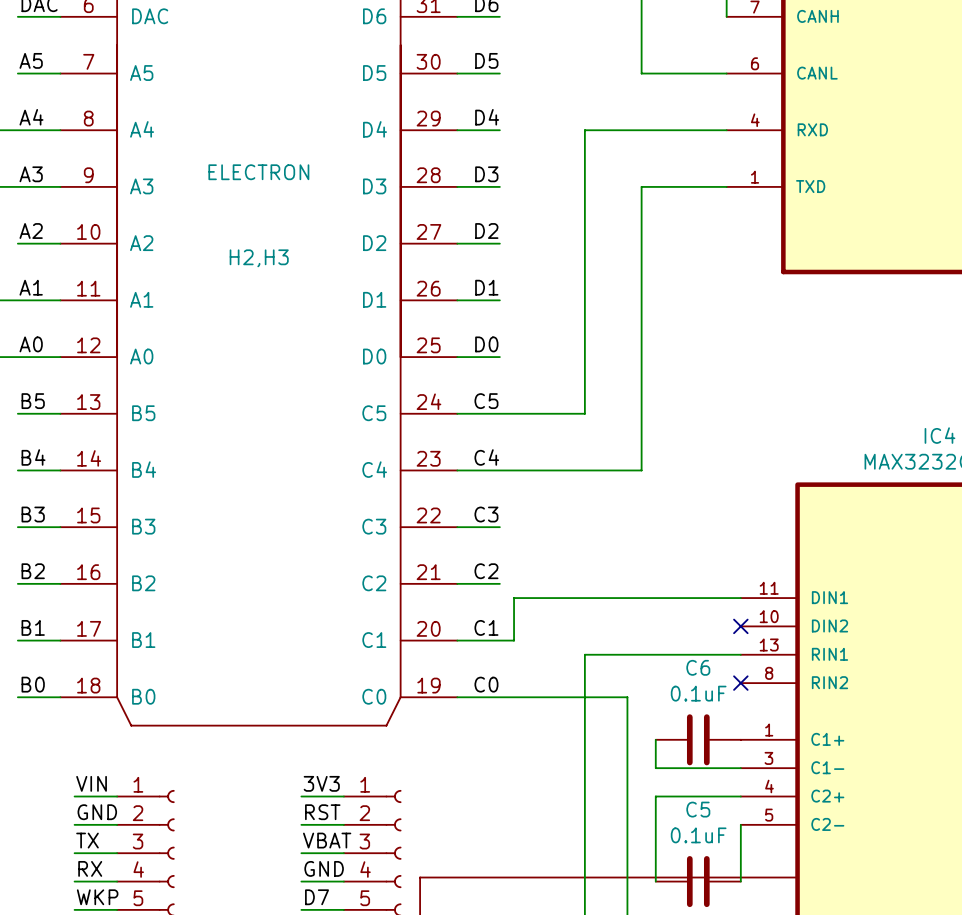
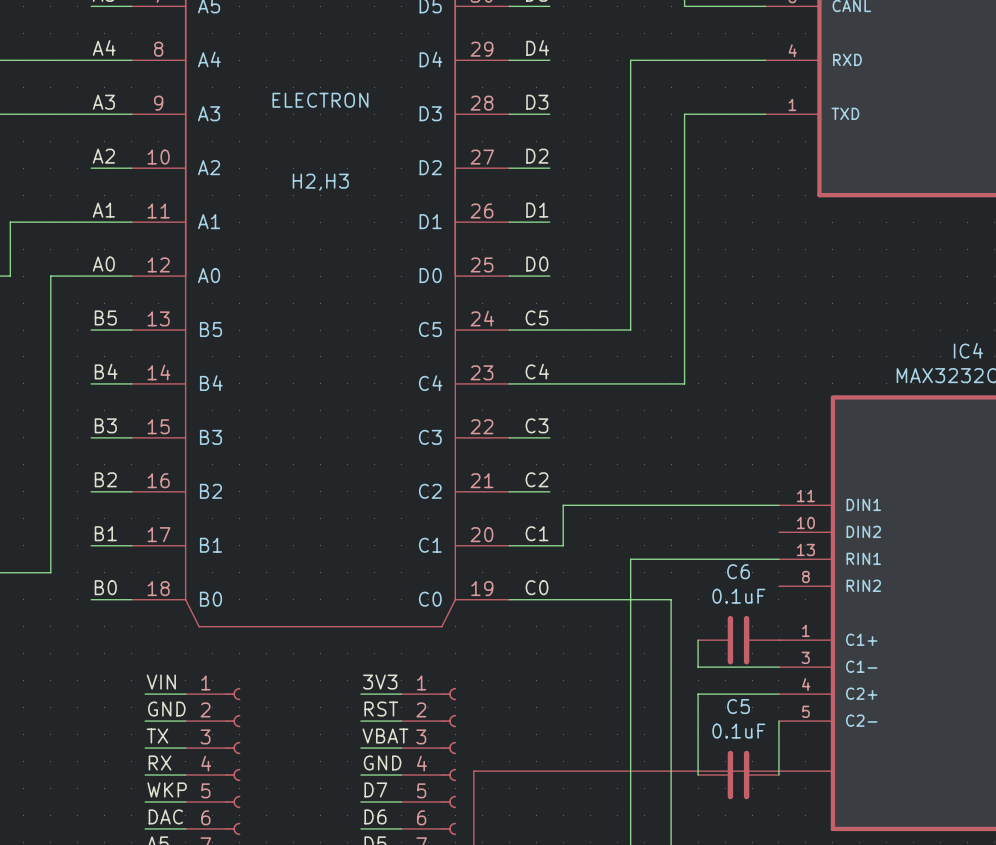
no-connect mark: (740, 626) -> none
no-connect mark: (740, 683) -> none

